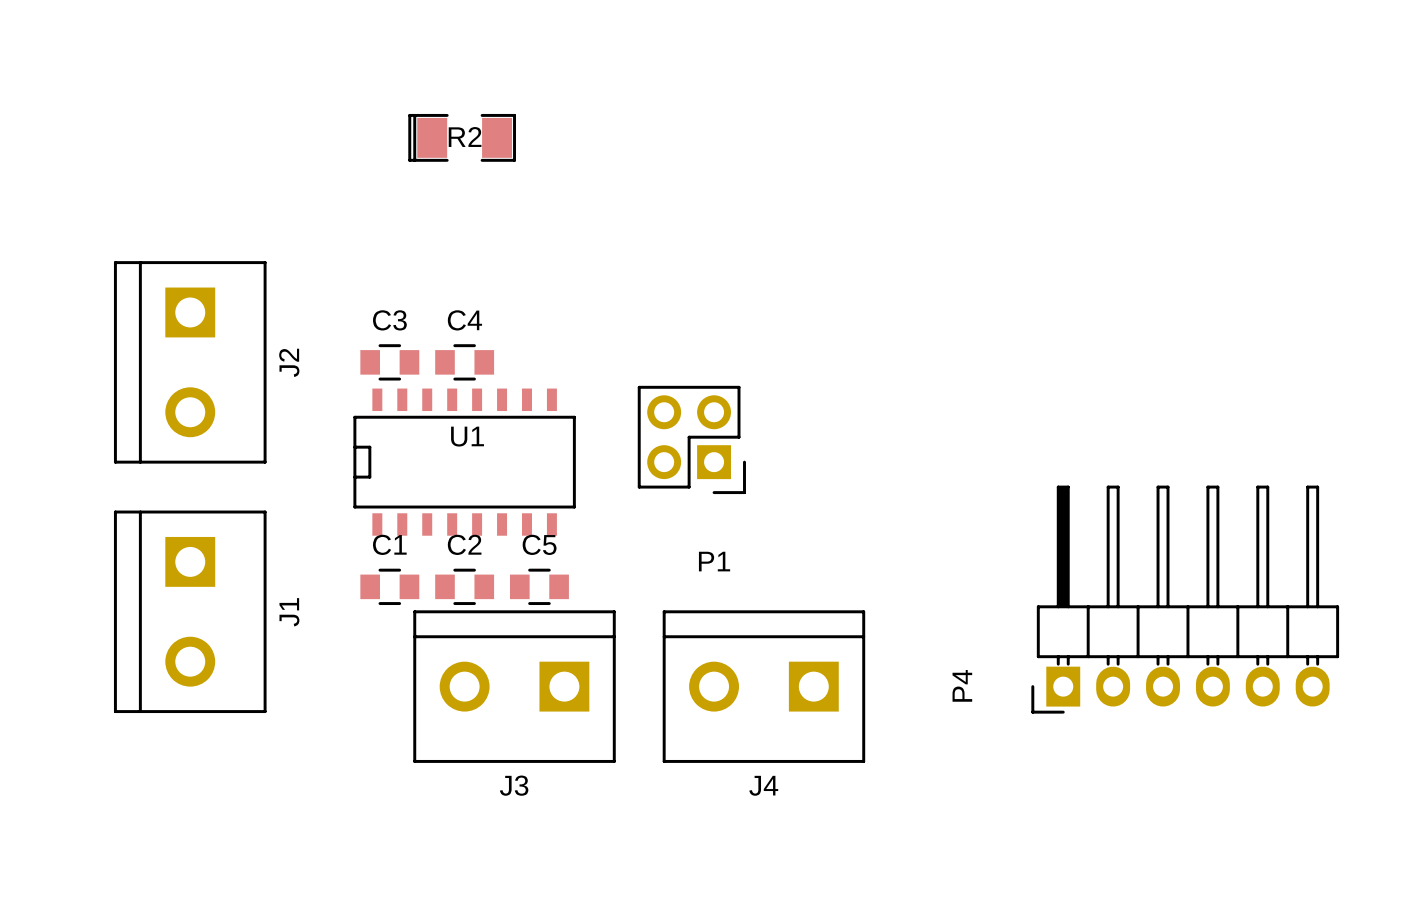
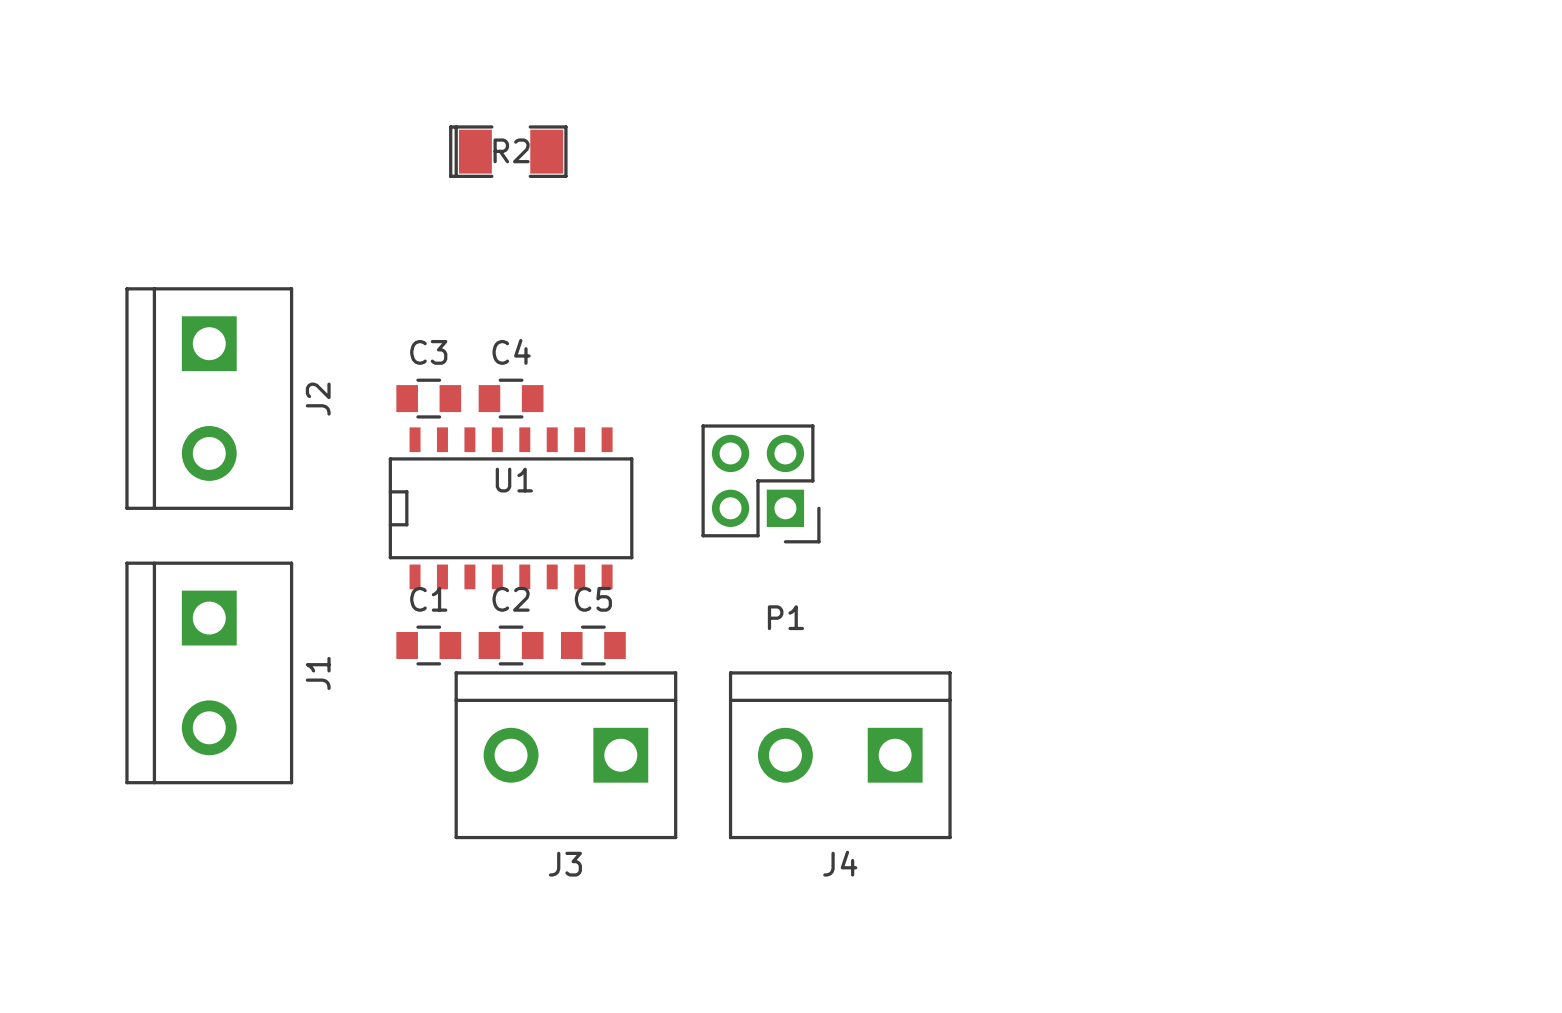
P4: (1185, 599) -> none

